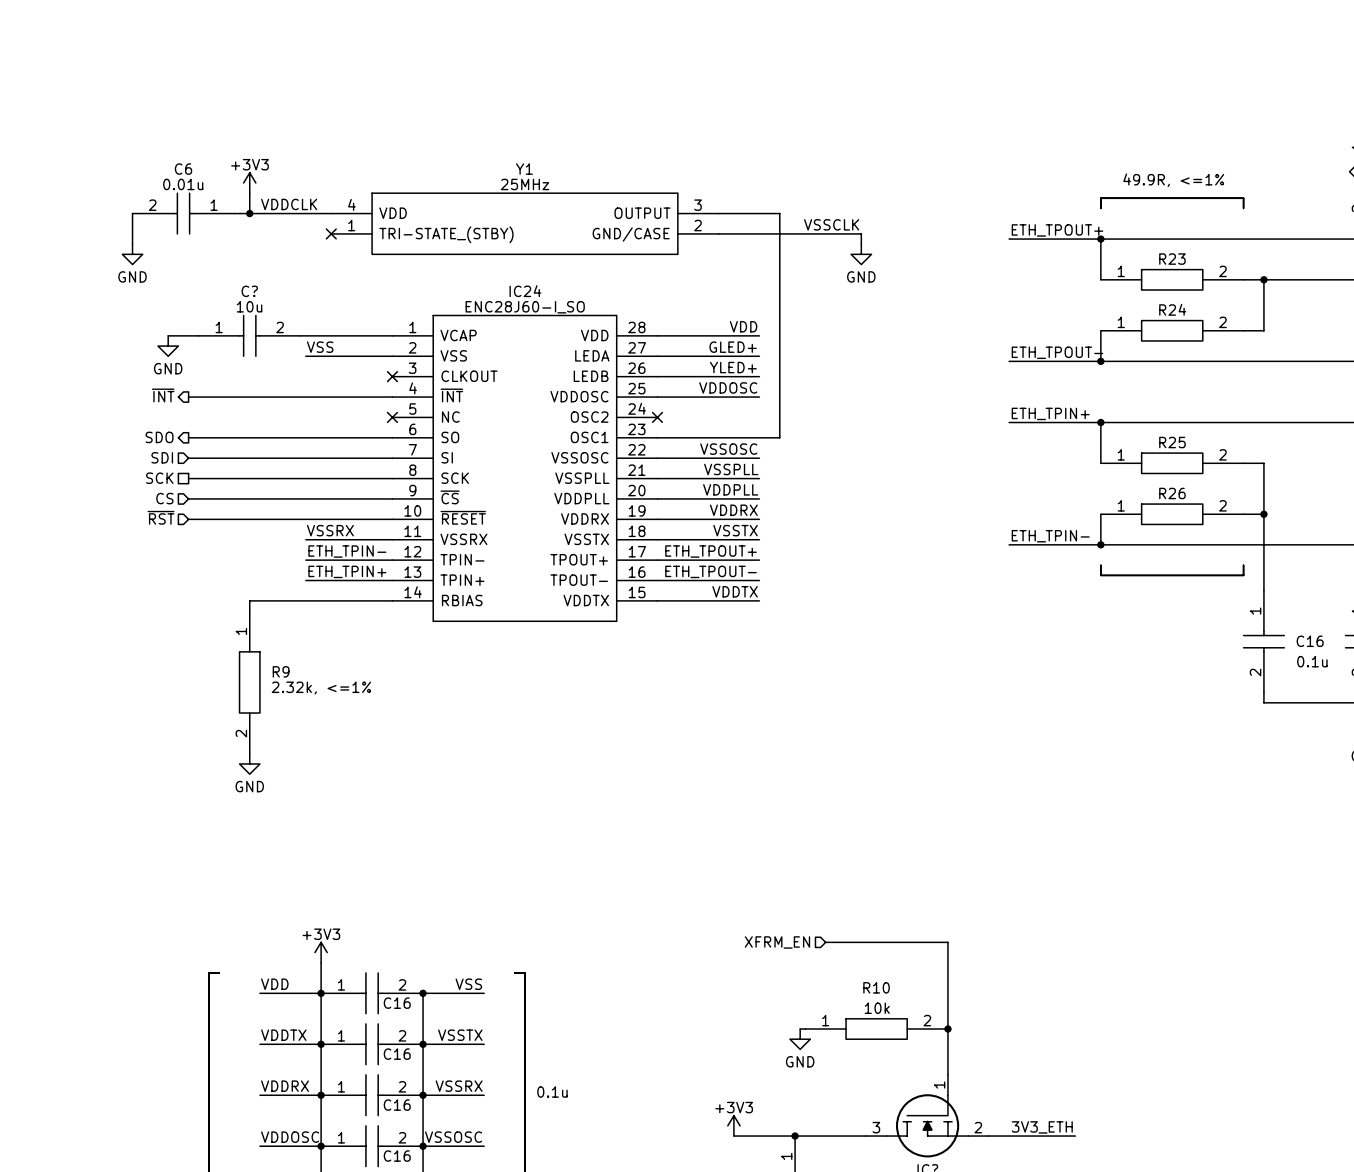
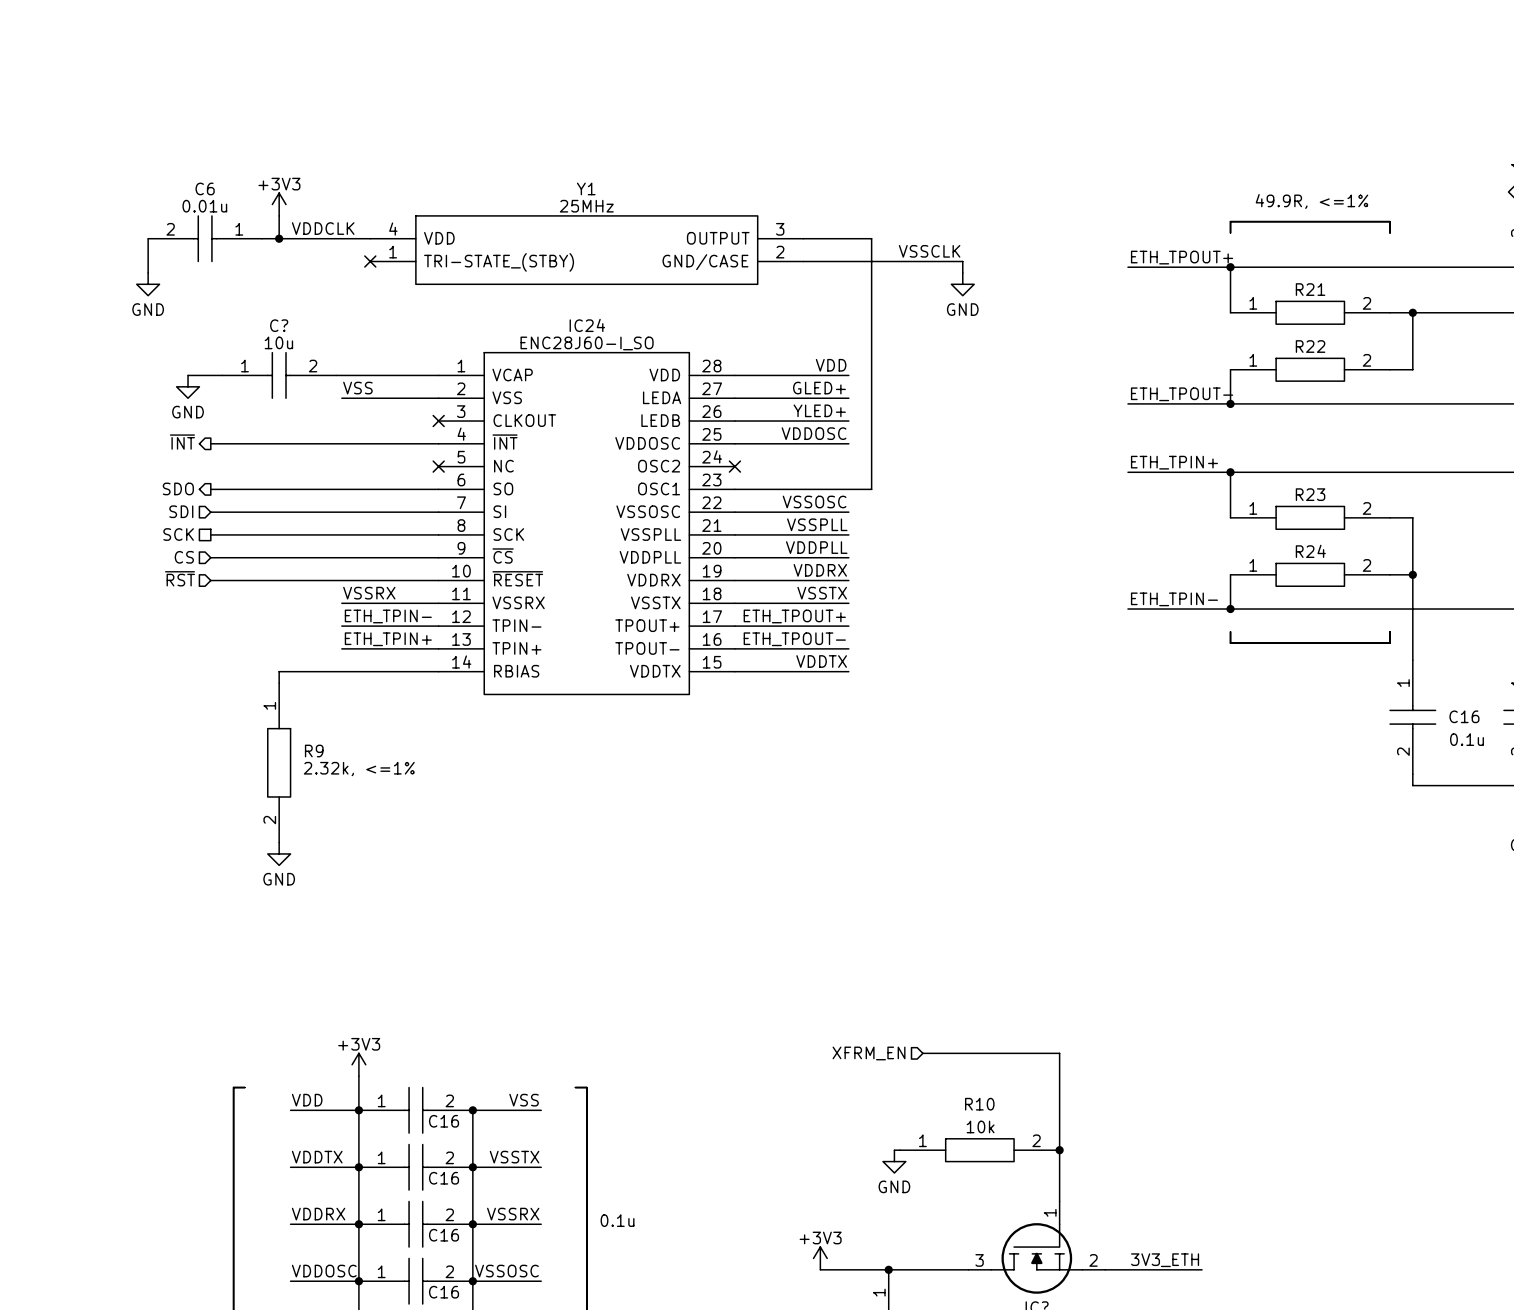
R23 name: R23 (1172, 259) -> R21 (1310, 289)
R24 name: R24 (1172, 309) -> R22 (1310, 346)
R25 name: R25 (1172, 442) -> R23 (1310, 494)
R26 name: R26 (1172, 493) -> R24 (1310, 551)

